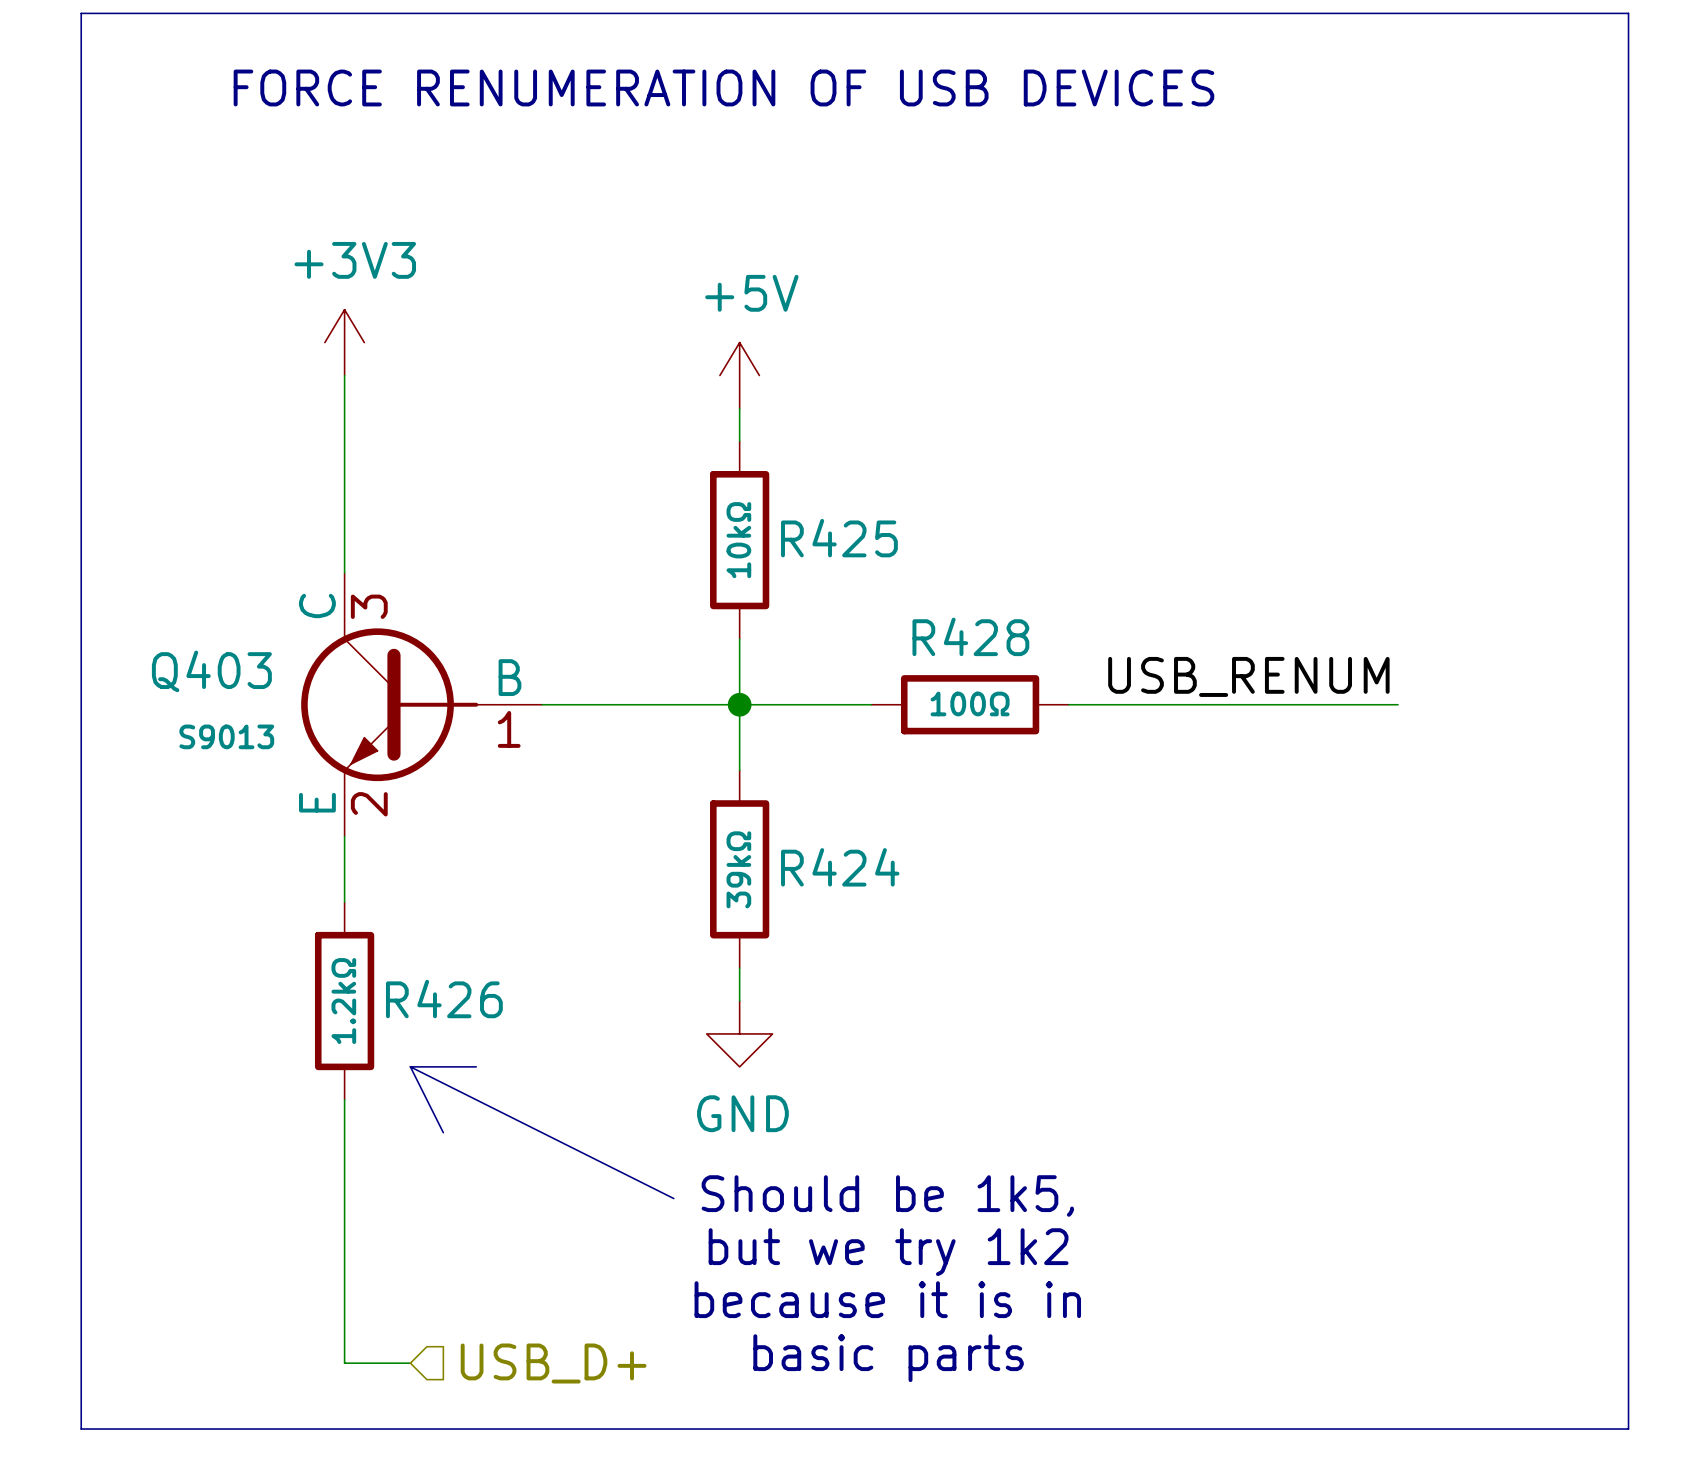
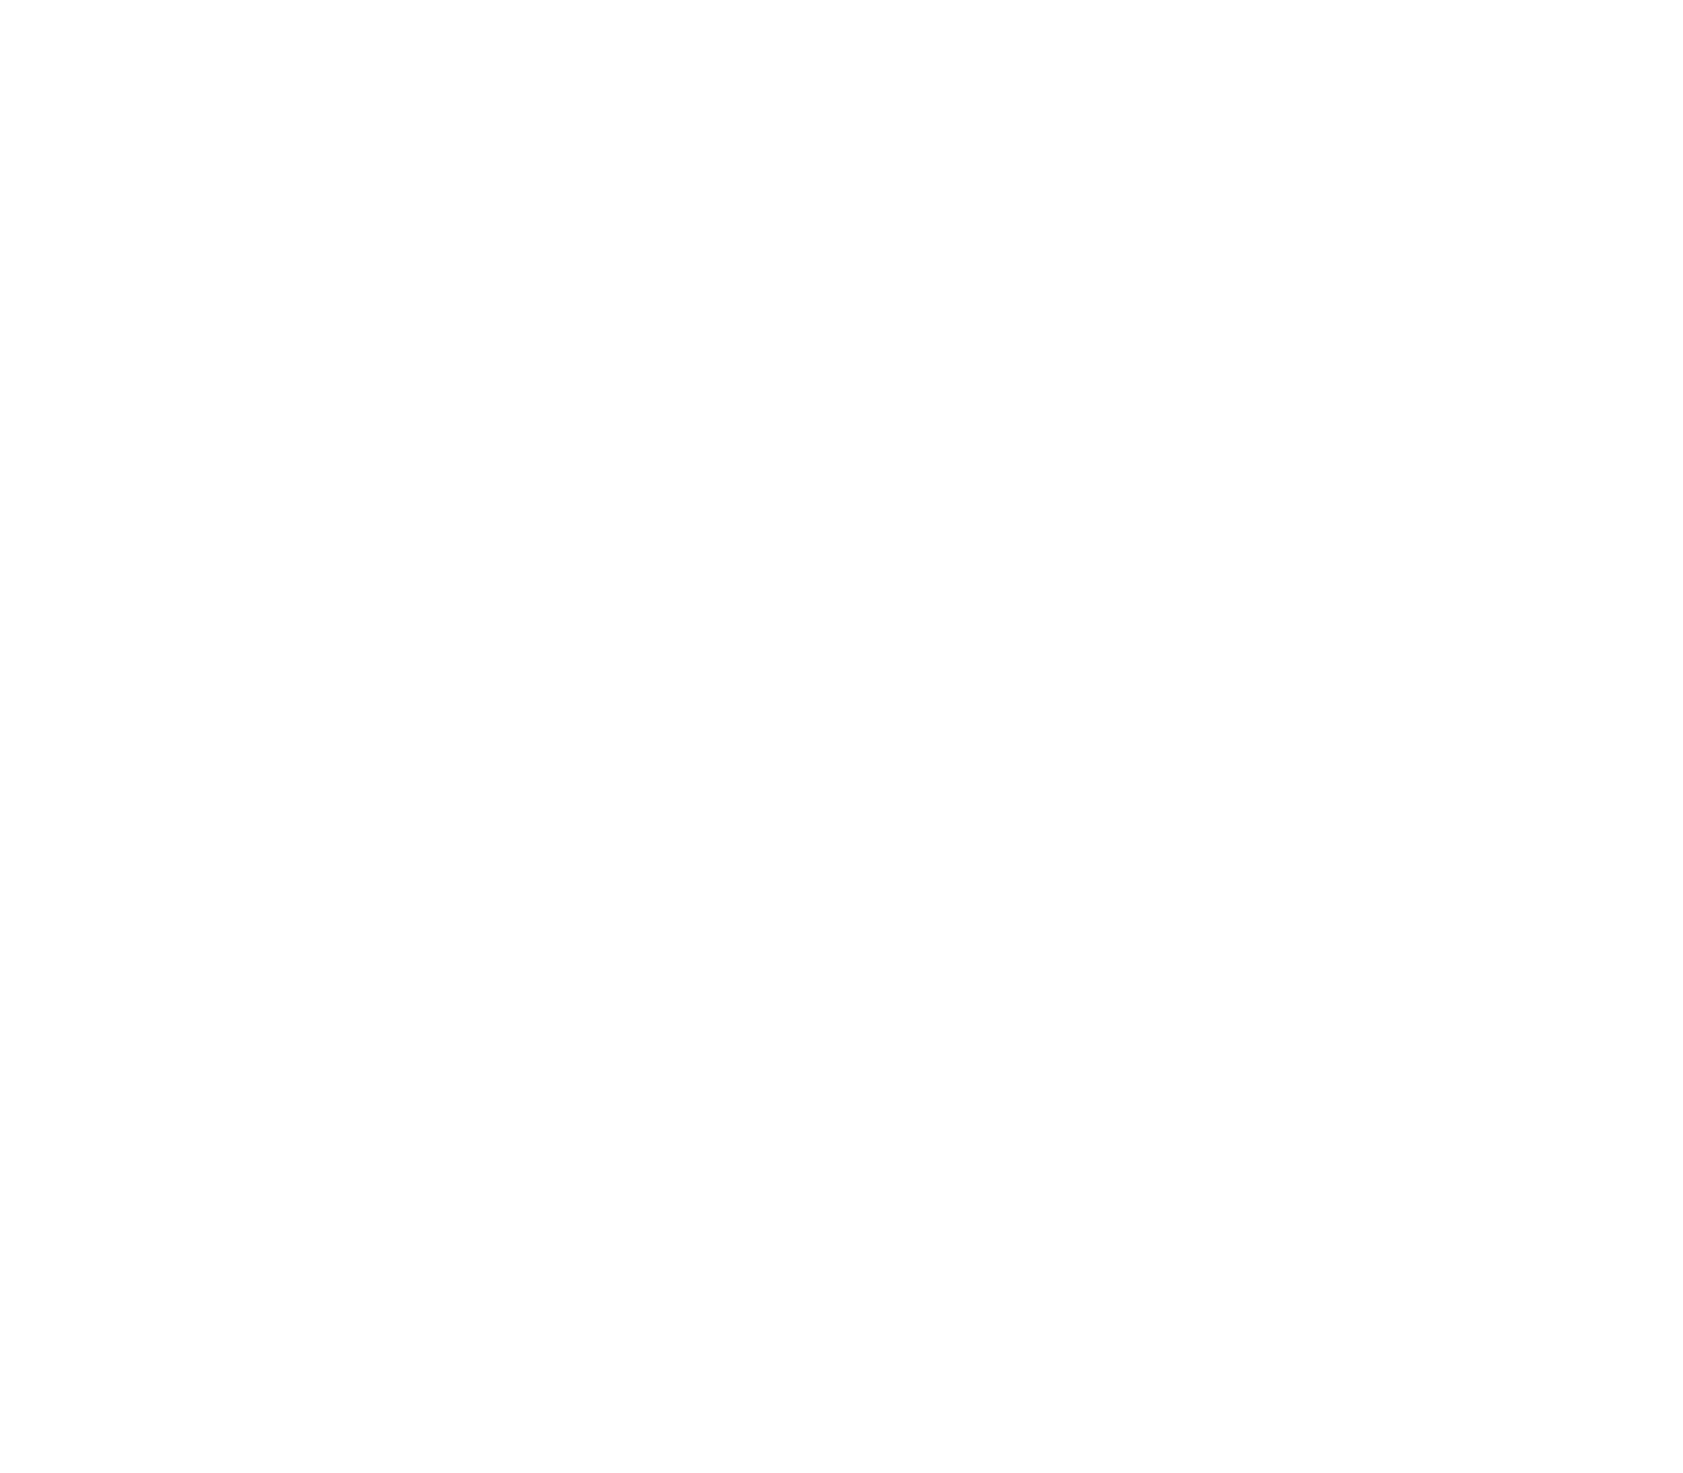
line: (81, 13) (1628, 13) (1628, 1429) (81, 1429) (81, 13) -> none
text: FORCE RENUMERATION OF USB DEVICES (723, 87) -> none
power symbol: +3V3 (344, 342) -> none
wire: (344, 375) (344, 573) -> none
power symbol: +5V (739, 375) -> none
wire: (739, 408) (739, 441) -> none
R425: 10kΩ (739, 540) -> none
wire: (739, 638) (739, 770) -> none
label: USB_RENUM (1248, 676) -> none
Q403: S9013 (421, 704) -> none
wire: (542, 704) (871, 704) -> none
junction: (739, 704) -> none
R428: 100Ω (970, 704) -> none
wire: (1068, 704) (1398, 704) -> none
wire: (344, 836) (344, 902) -> none
R424: 39kΩ (739, 869) -> none
wire: (739, 968) (739, 1001) -> none
R426: 1.2kΩ (344, 1001) -> none
power symbol: GND (739, 1033) -> none
line: (410, 1066) (673, 1198) -> none
line: (410, 1066) (443, 1132) -> none
line: (410, 1066) (476, 1066) -> none
wire: (344, 1099) (344, 1363) (410, 1363) -> none
text: Should be 1k5, (887, 1196) -> none
text: but we try 1k2 (888, 1252) -> none
text: because it is in (887, 1299) -> none
text: basic parts (888, 1358) -> none
hierarchical label: USB_D+ (553, 1363) -> none

